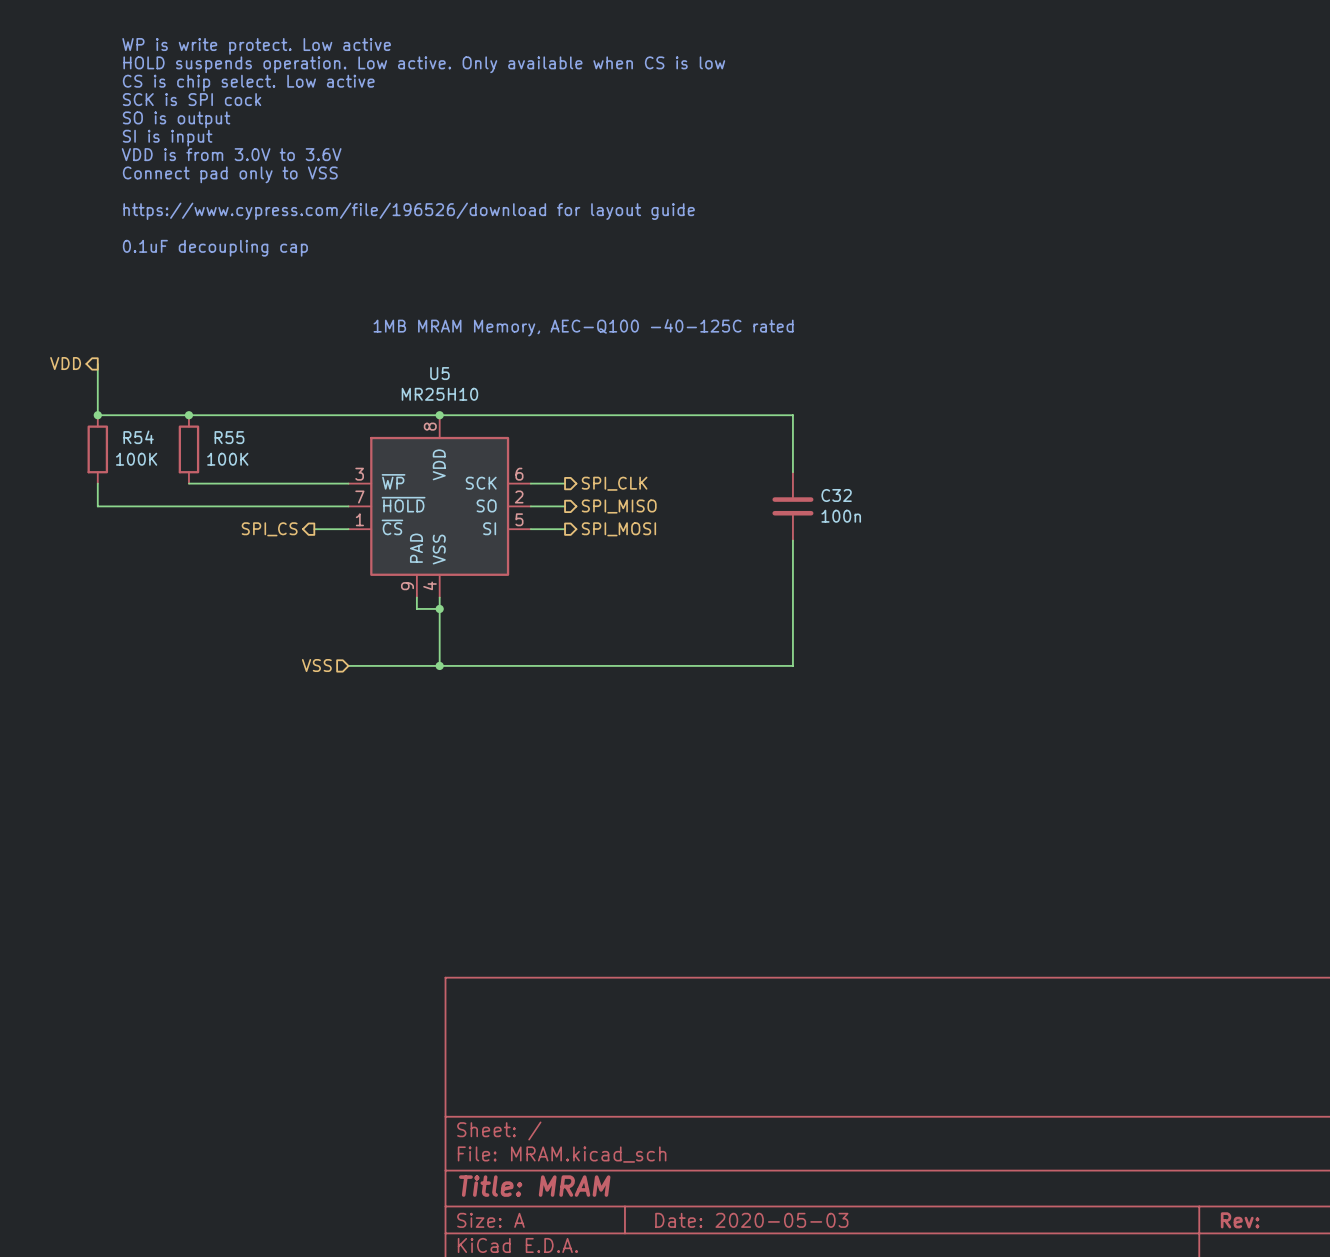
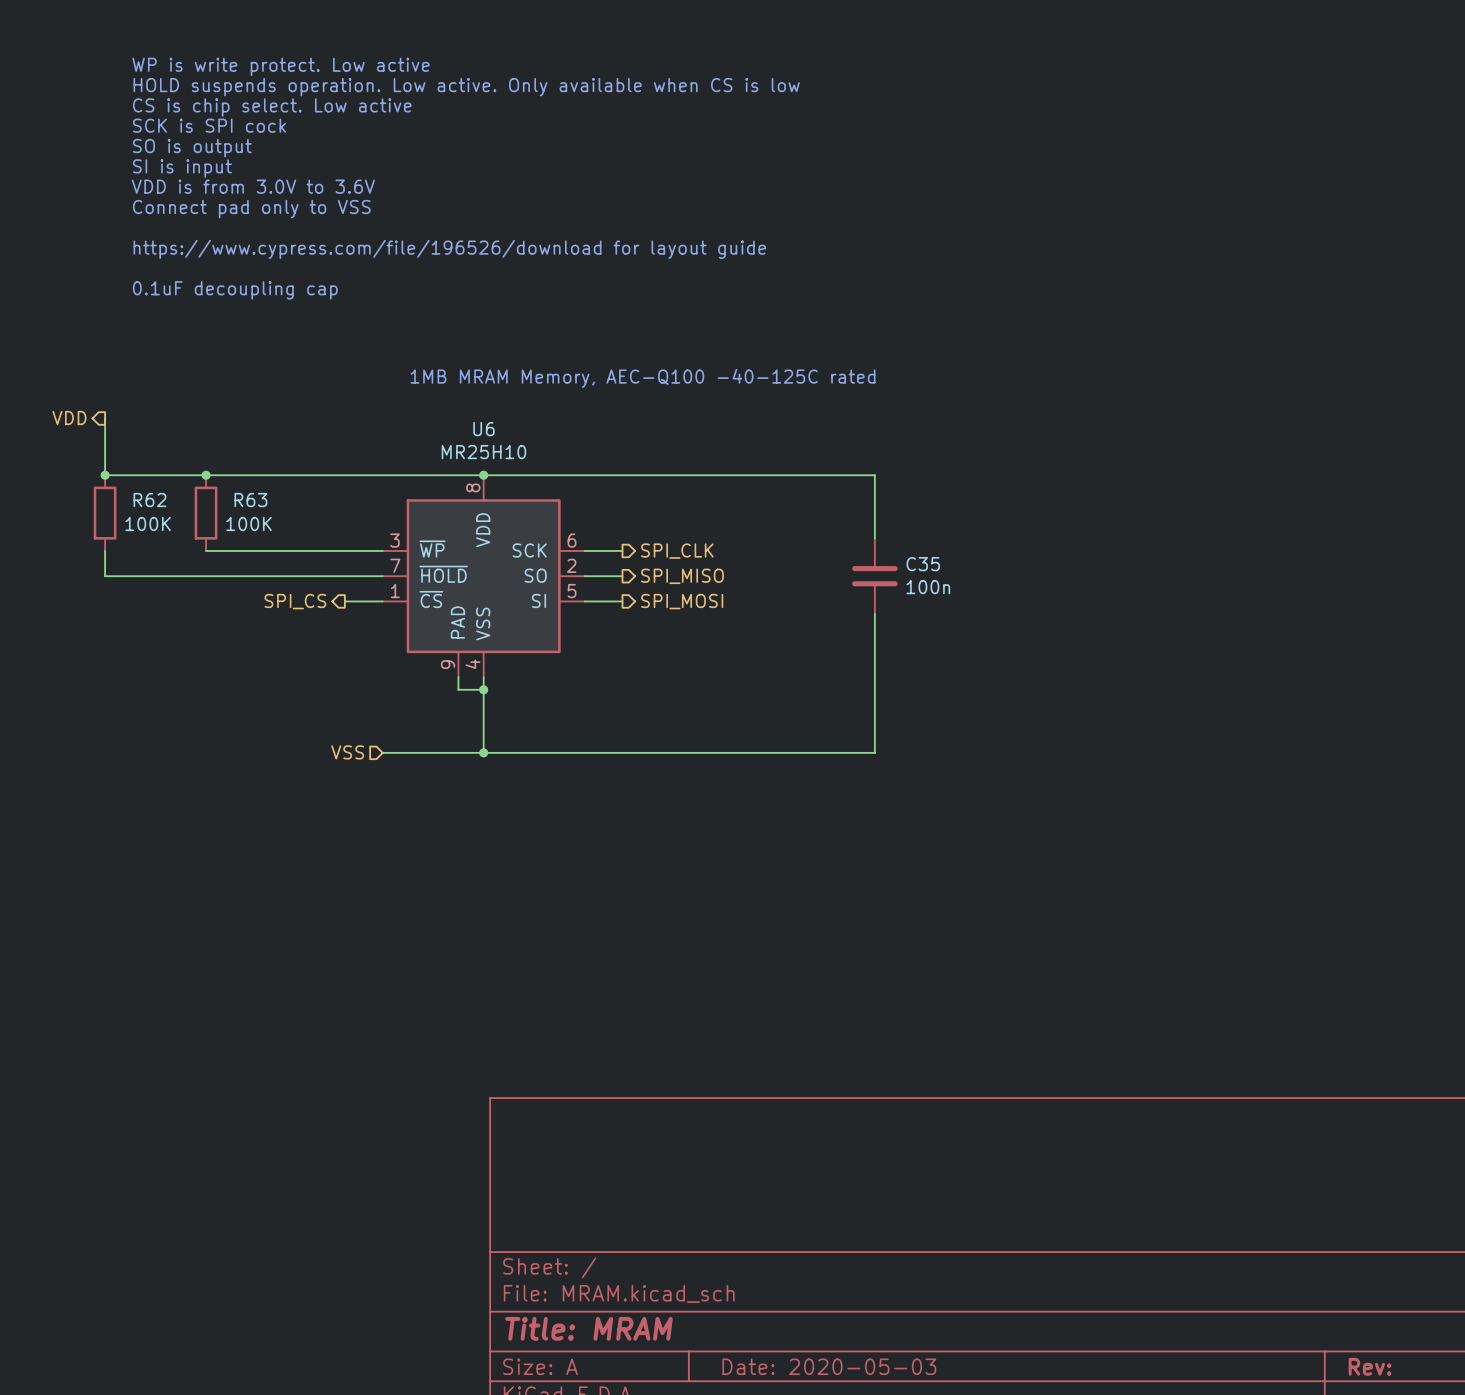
U5 name: U5 (439, 373) -> U6 (483, 429)
R54 name: R54 (138, 437) -> R62 (149, 500)
R55 name: R55 (229, 437) -> R63 (250, 500)
C32 name: C32 (836, 495) -> C35 (923, 564)

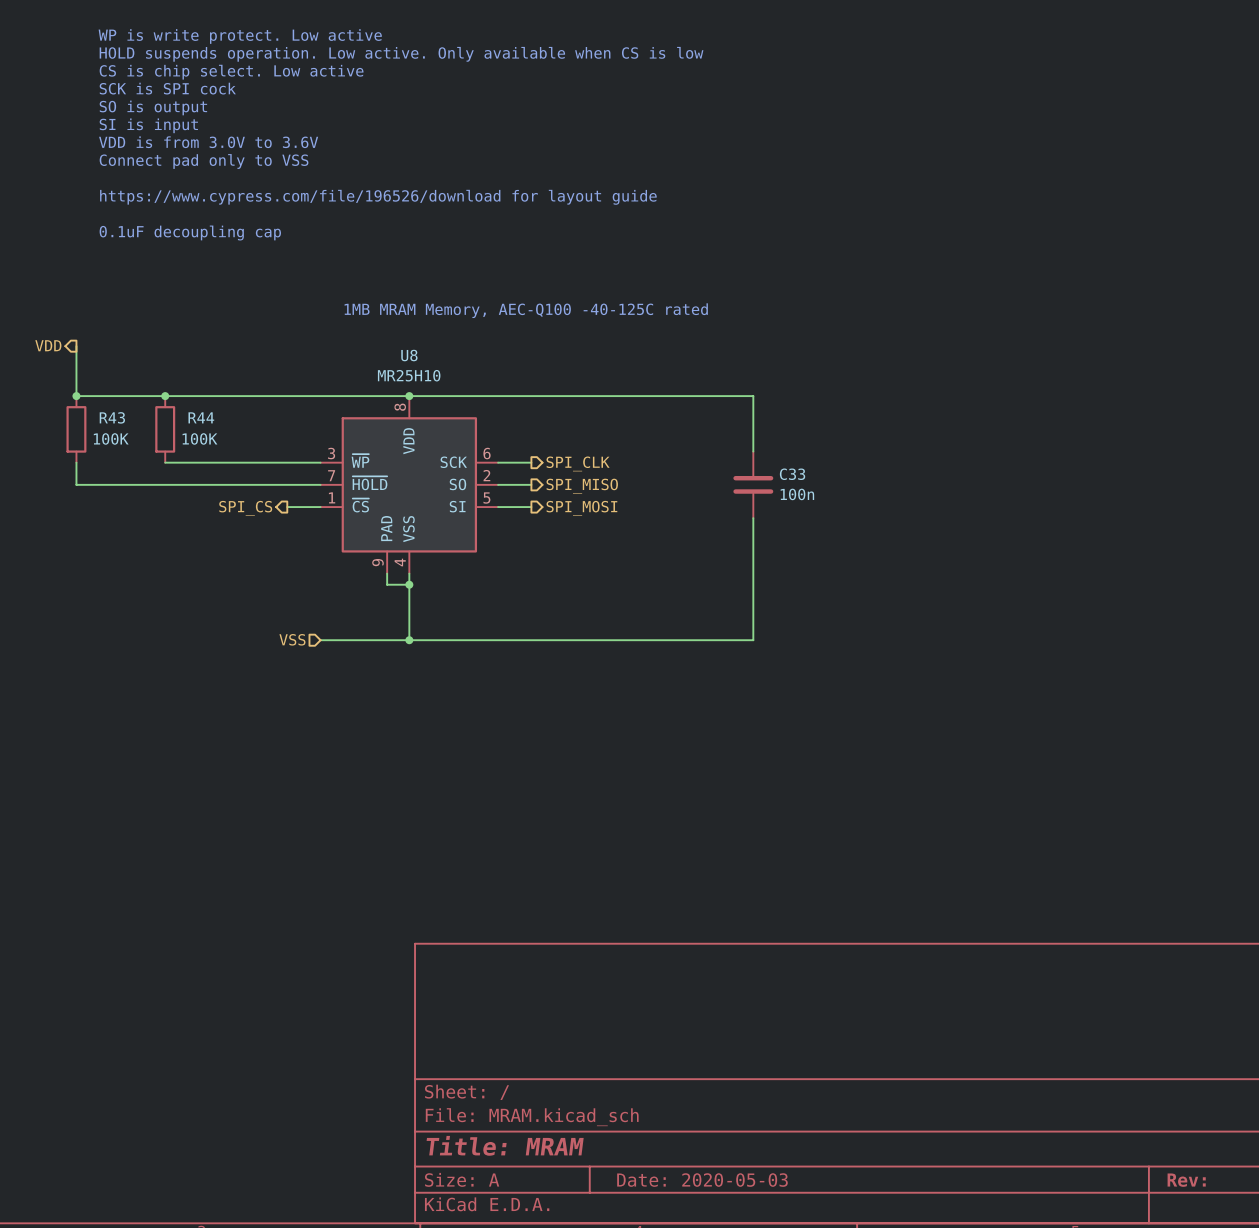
U6 name: U6 (483, 429) -> U8 (409, 355)
R62 name: R62 (149, 500) -> R43 (112, 417)
R63 name: R63 (250, 500) -> R44 (201, 417)
C35 name: C35 (923, 564) -> C33 (792, 474)

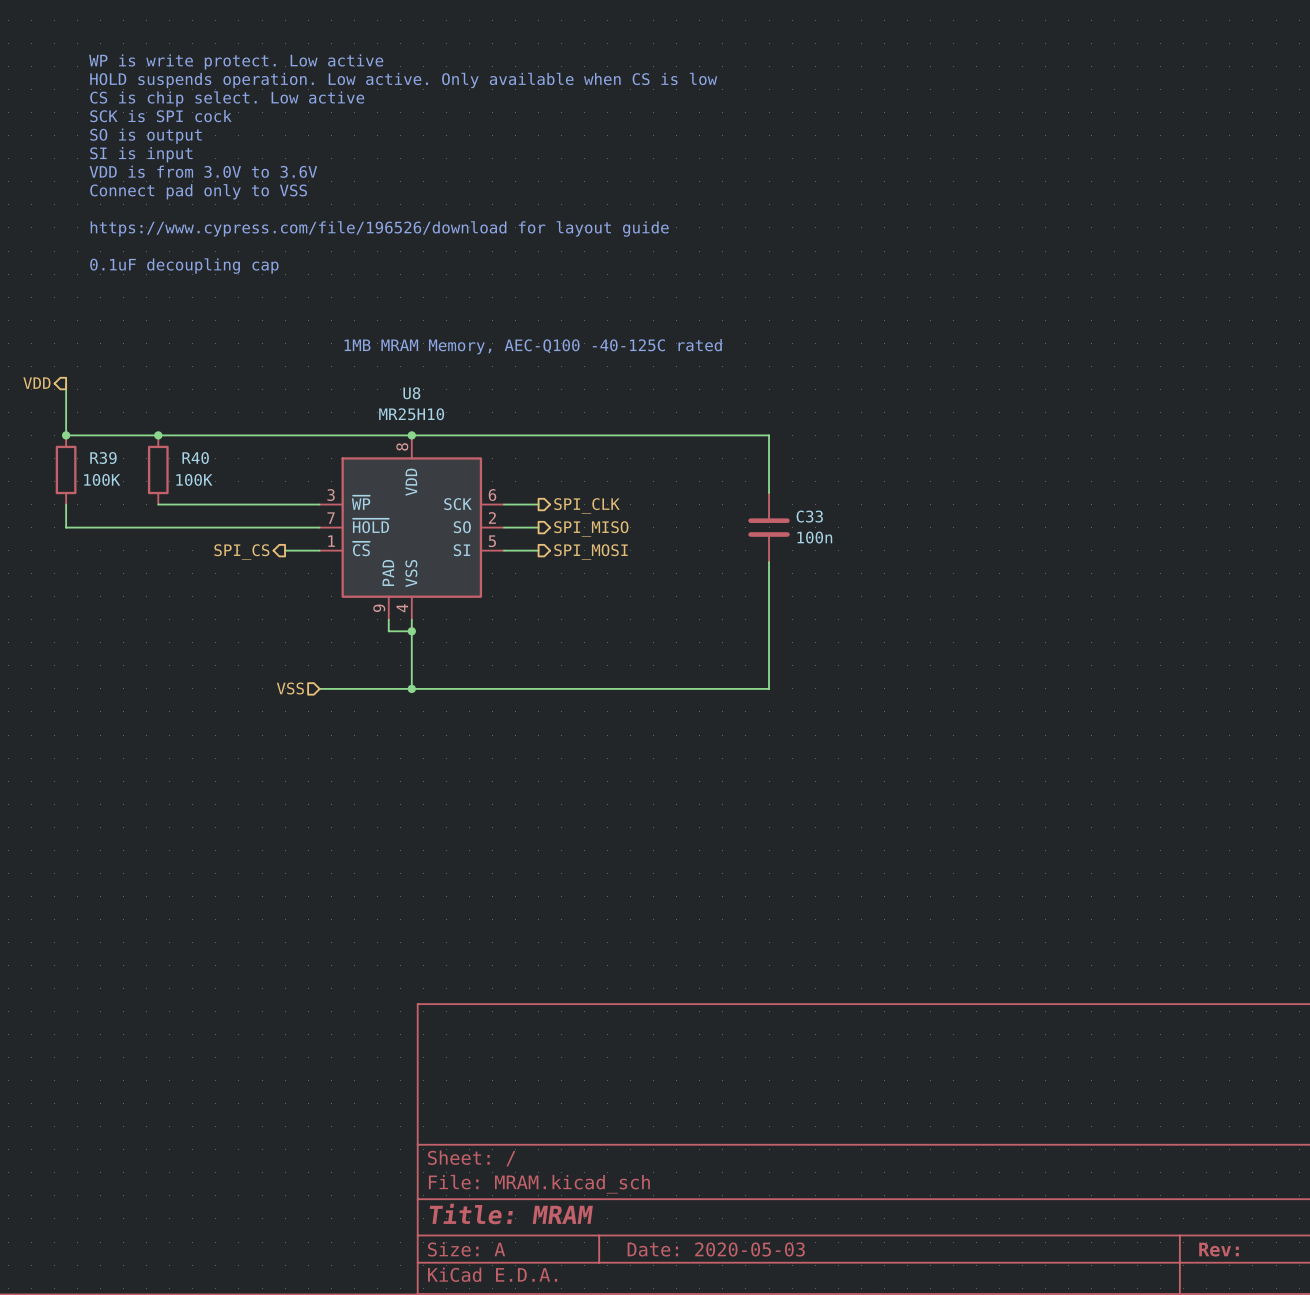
R43 name: R43 (112, 417) -> R39 (103, 458)
R44 name: R44 (201, 417) -> R40 (195, 458)

